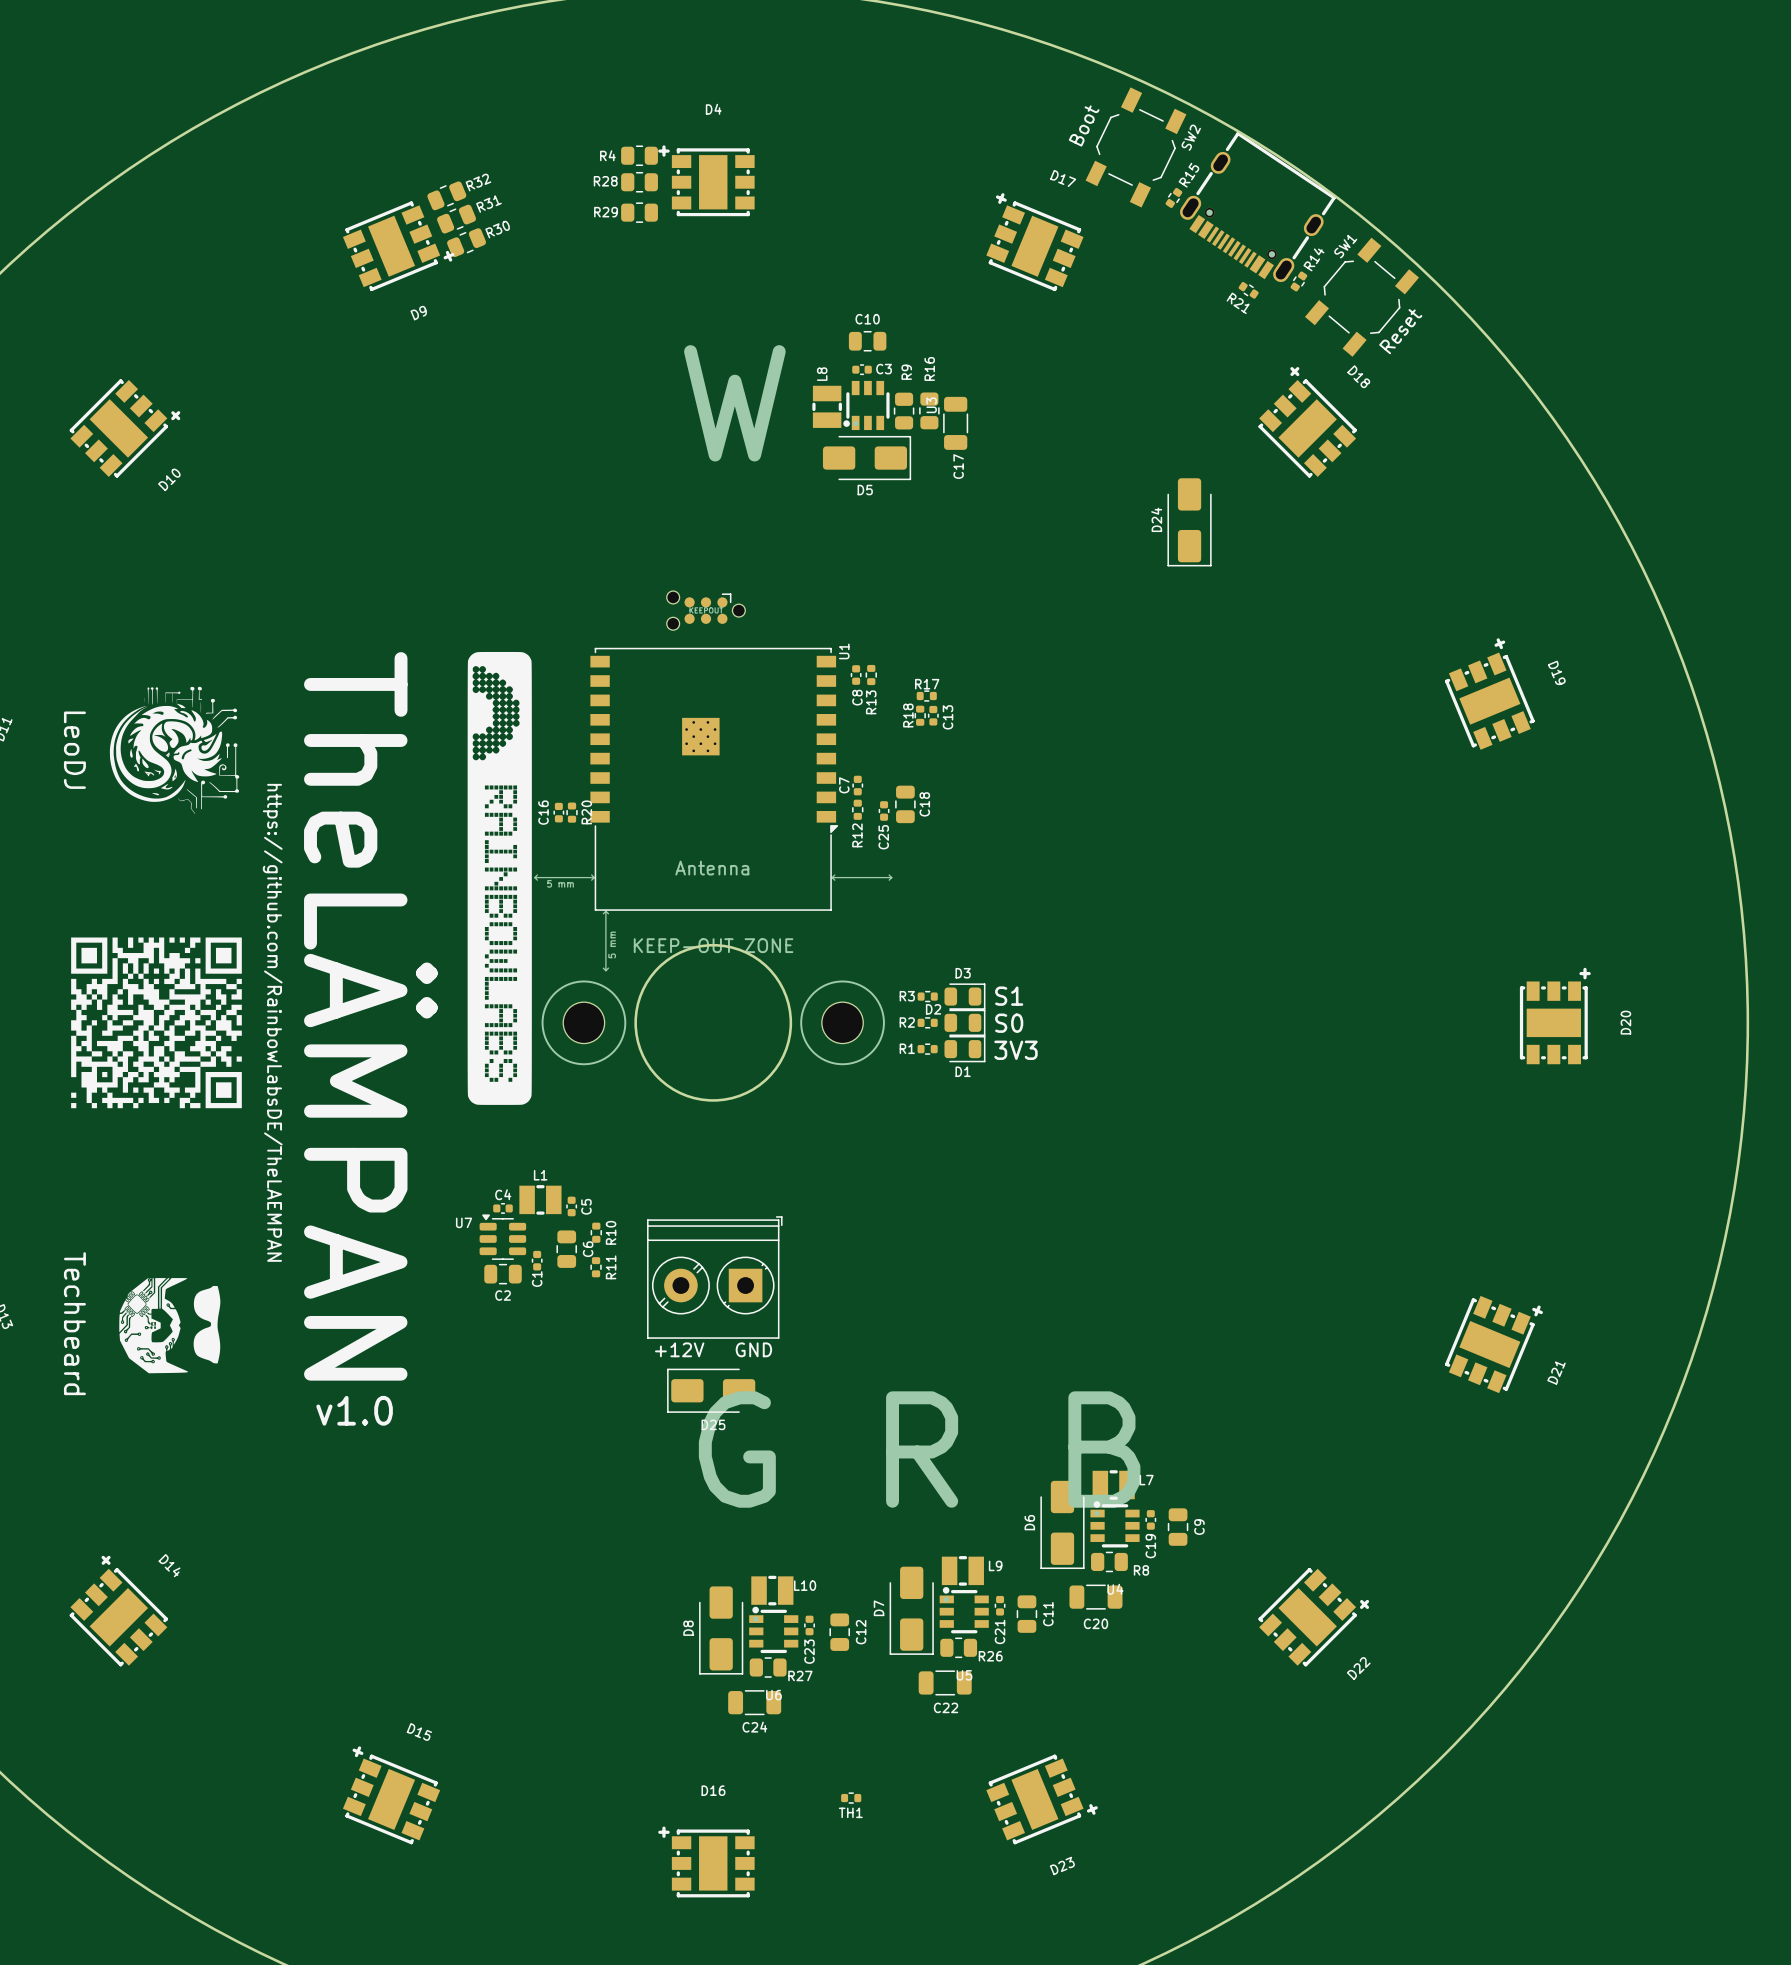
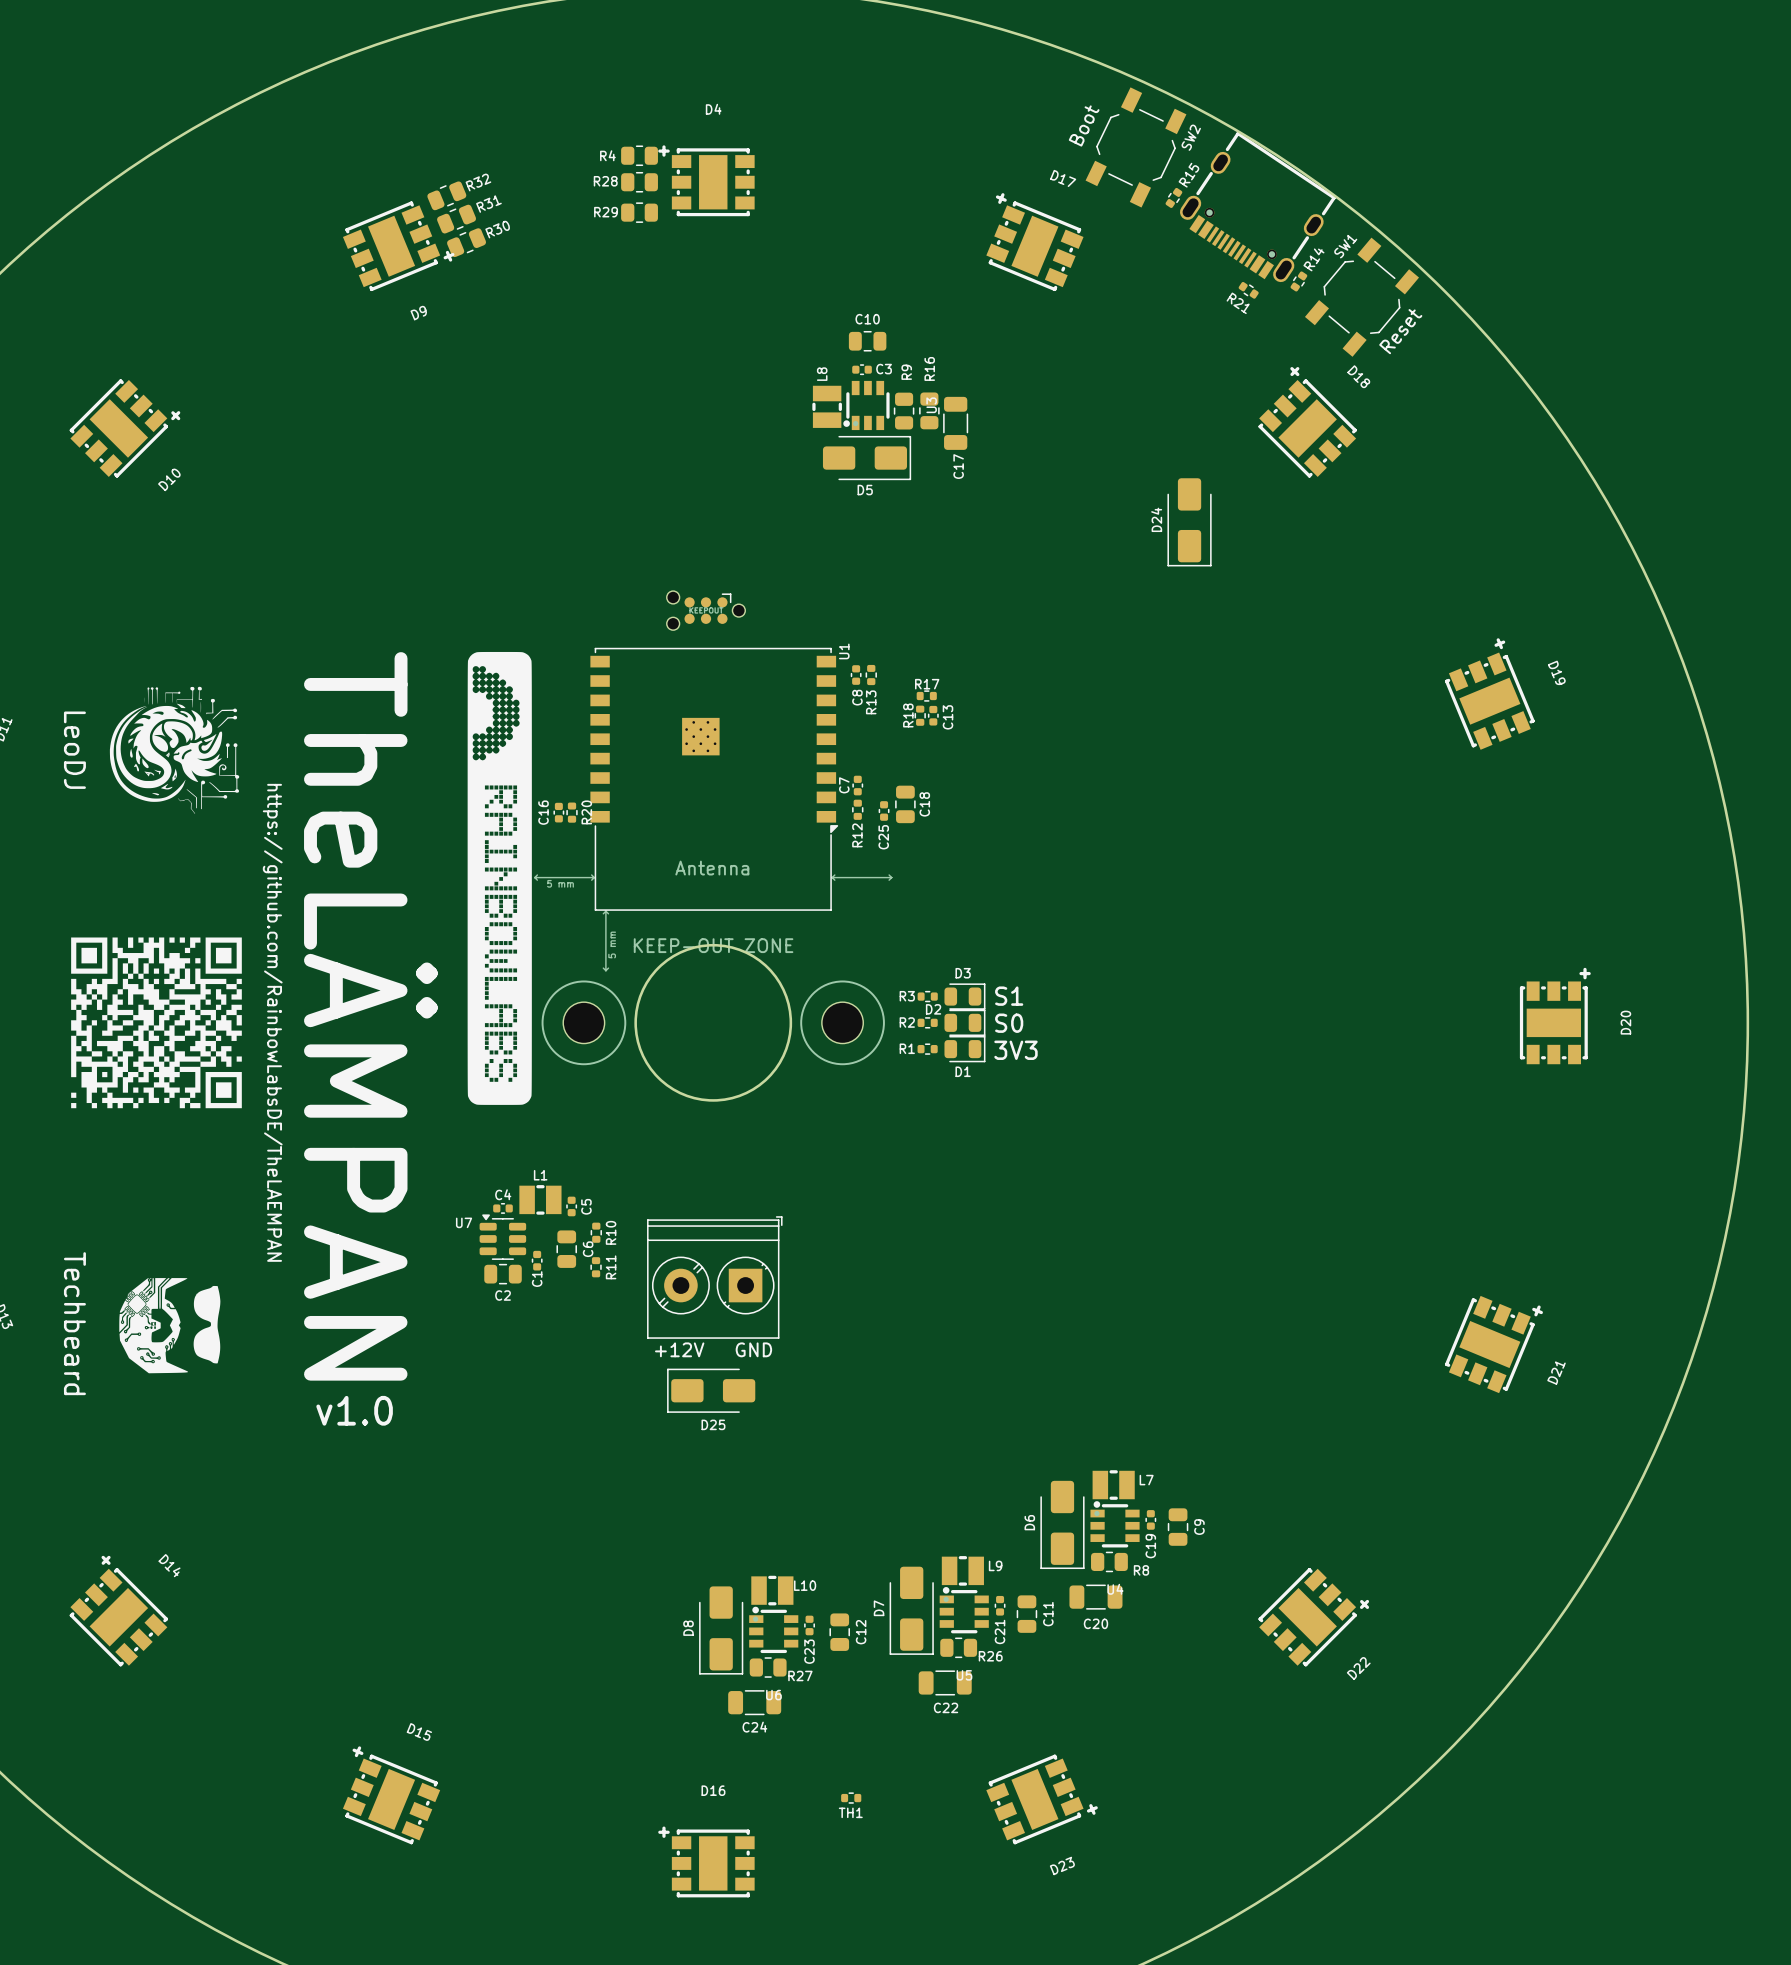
text: W (734, 403) -> none
text: G R B (919, 1449) -> none

